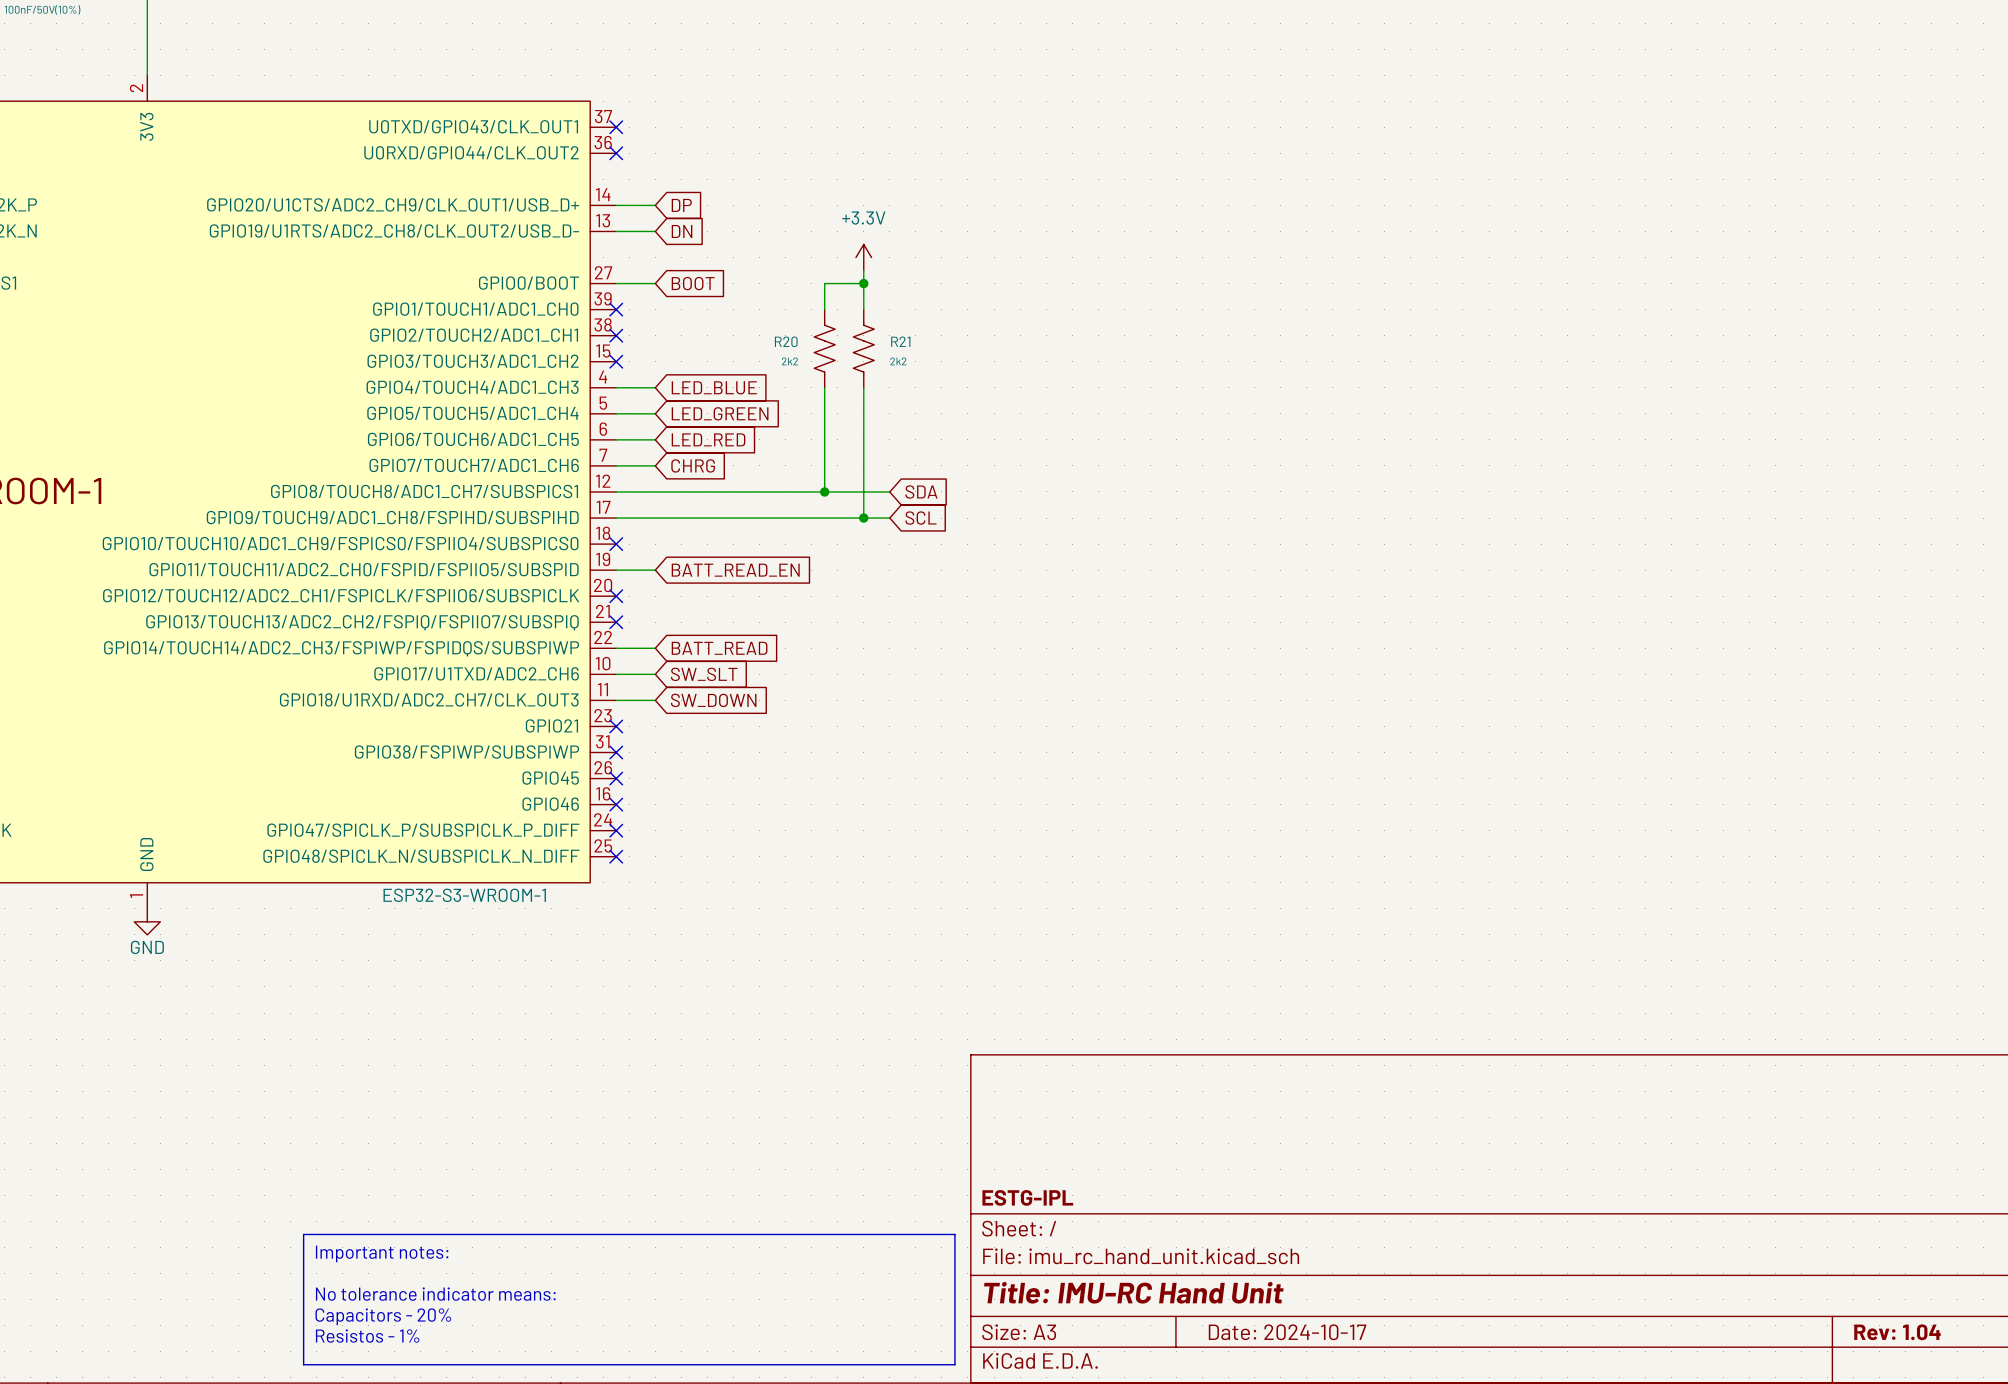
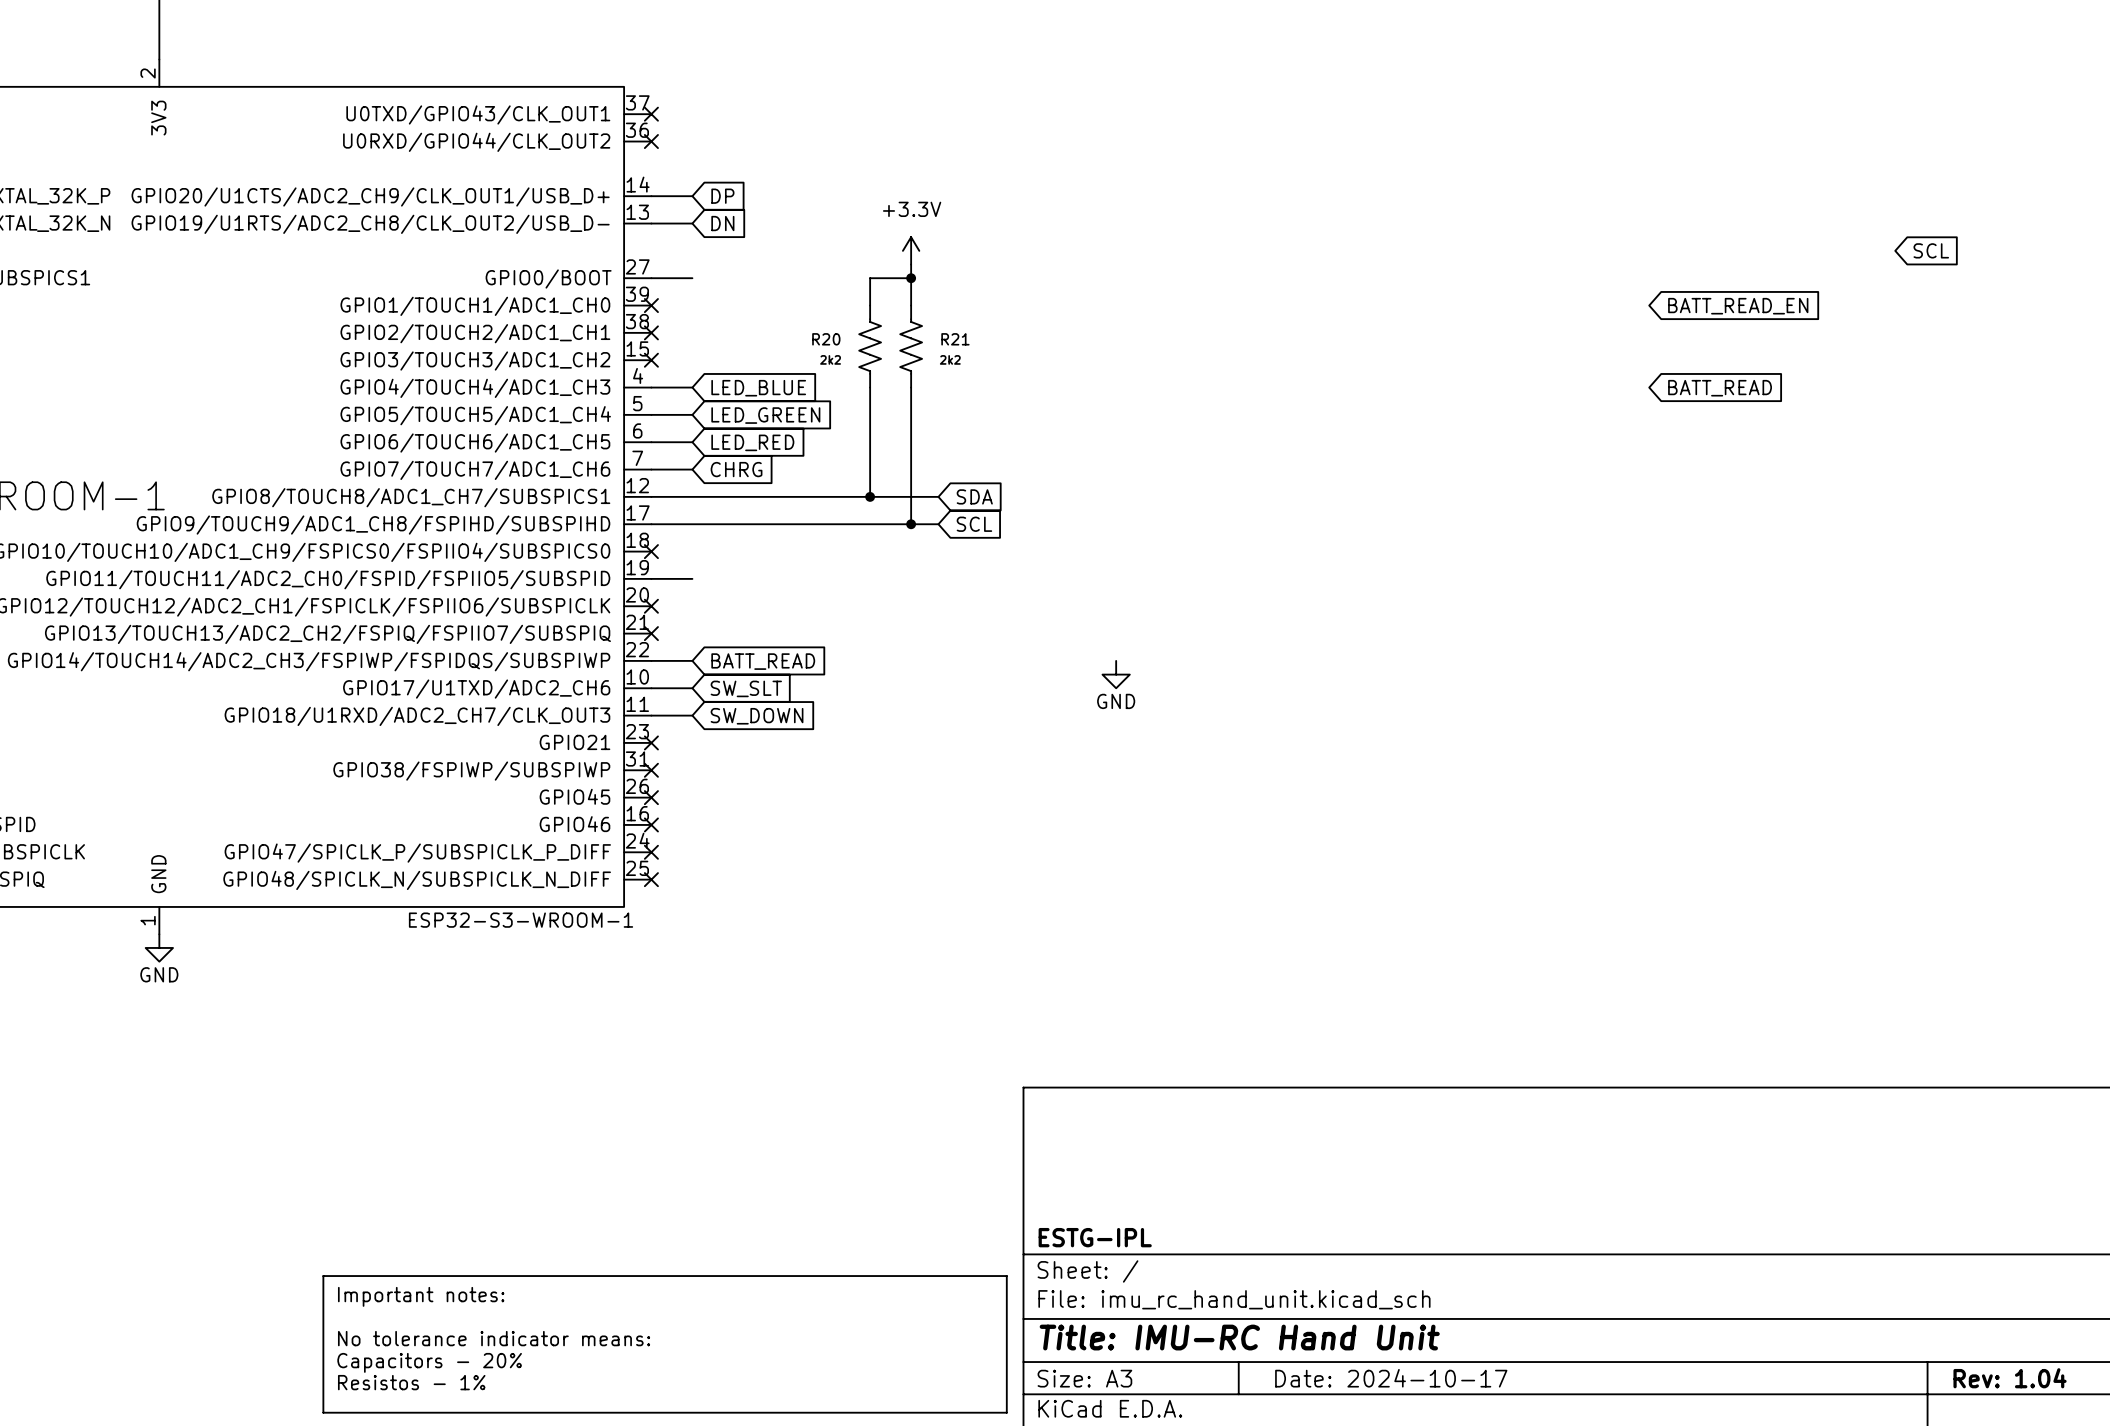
global label: none -> SCL (1931, 250)
global label: BOOT (693, 283) -> none
global label: none -> BATT_READ_EN (1738, 306)
global label: none -> BATT_READ (1720, 388)
global label: BATT_READ_EN (735, 570) -> none
power symbol: none -> GND (1116, 674)

